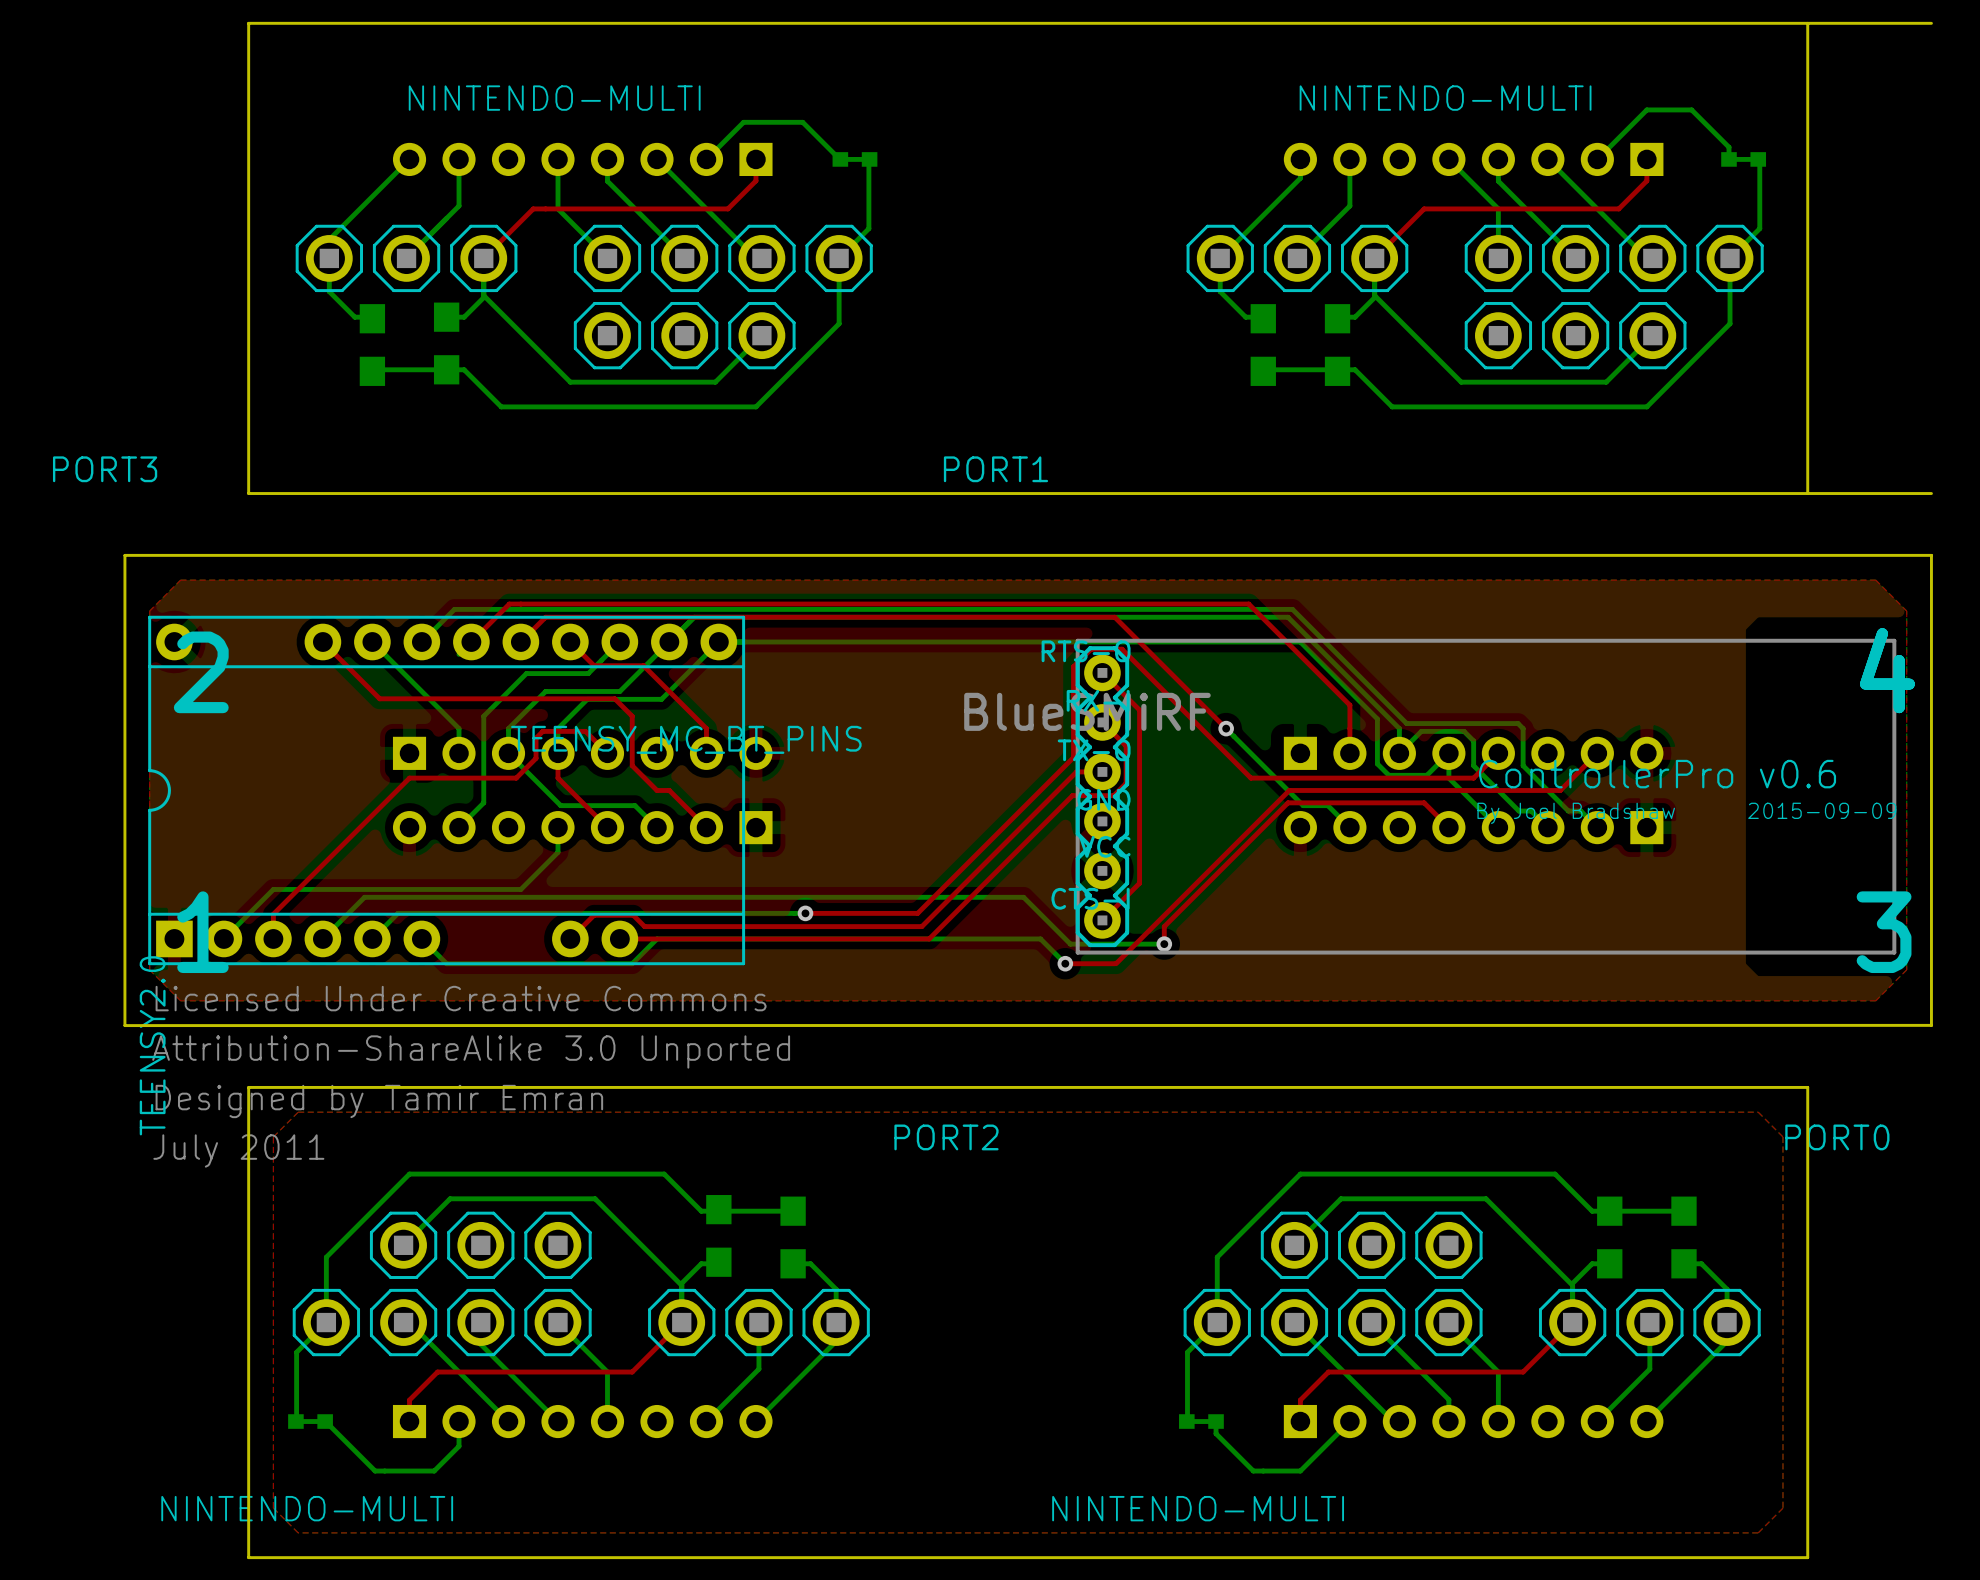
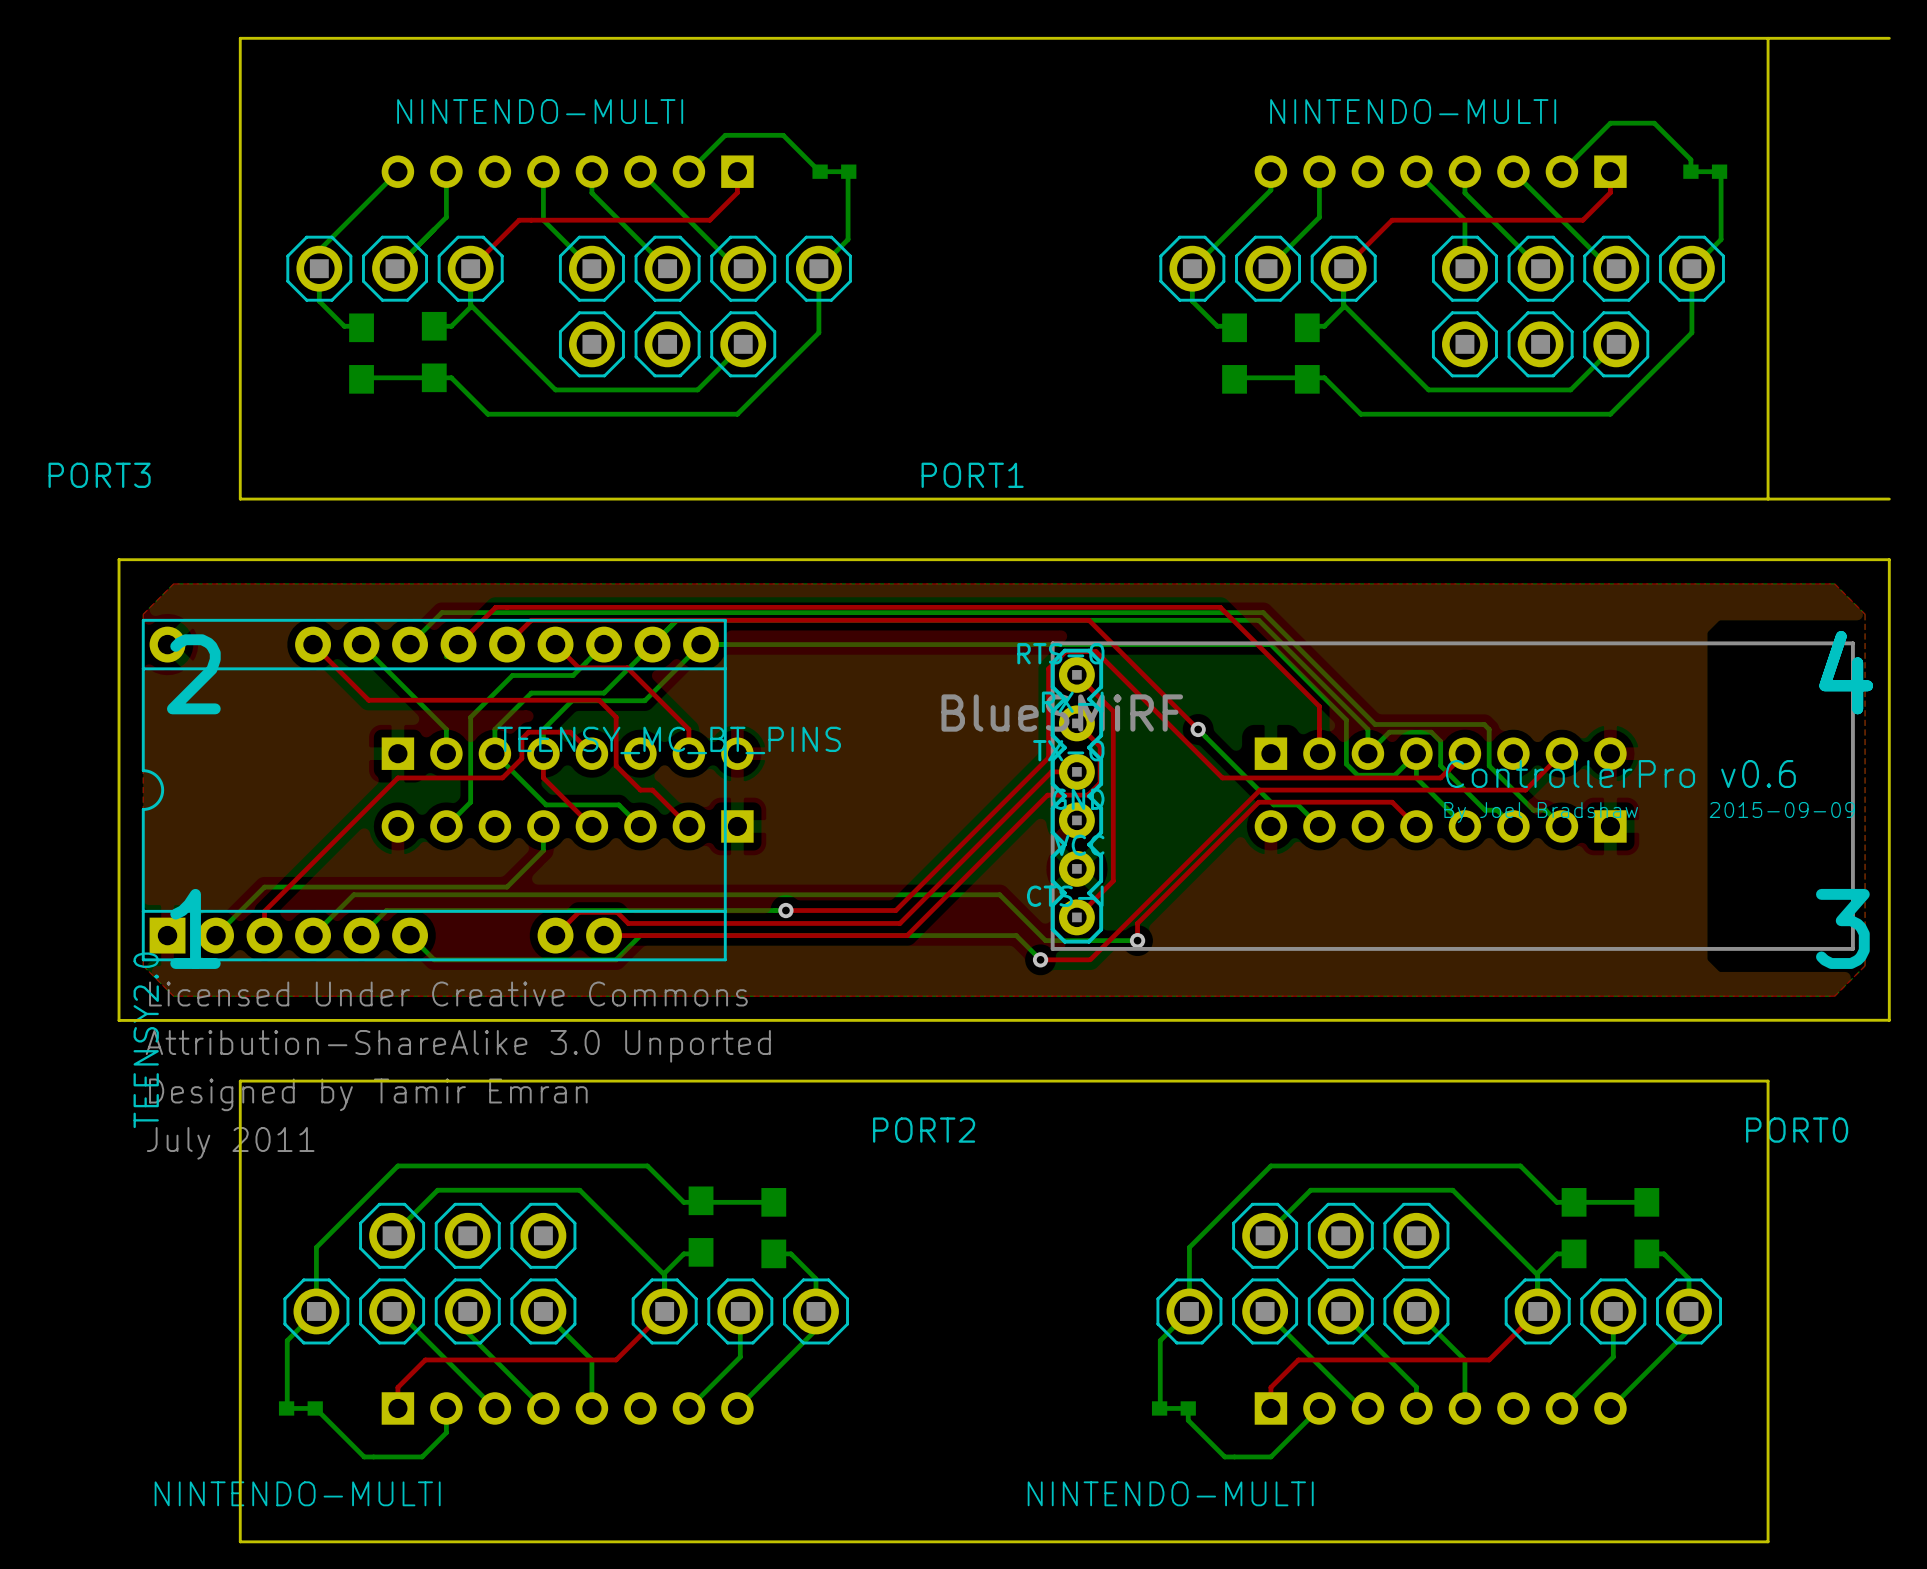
top zone outline: (298, 1112) (273, 1136) (273, 1508) (298, 1532) (1758, 1532) (1782, 1508) (1782, 1136) (1758, 1112) (298, 1112) -> none

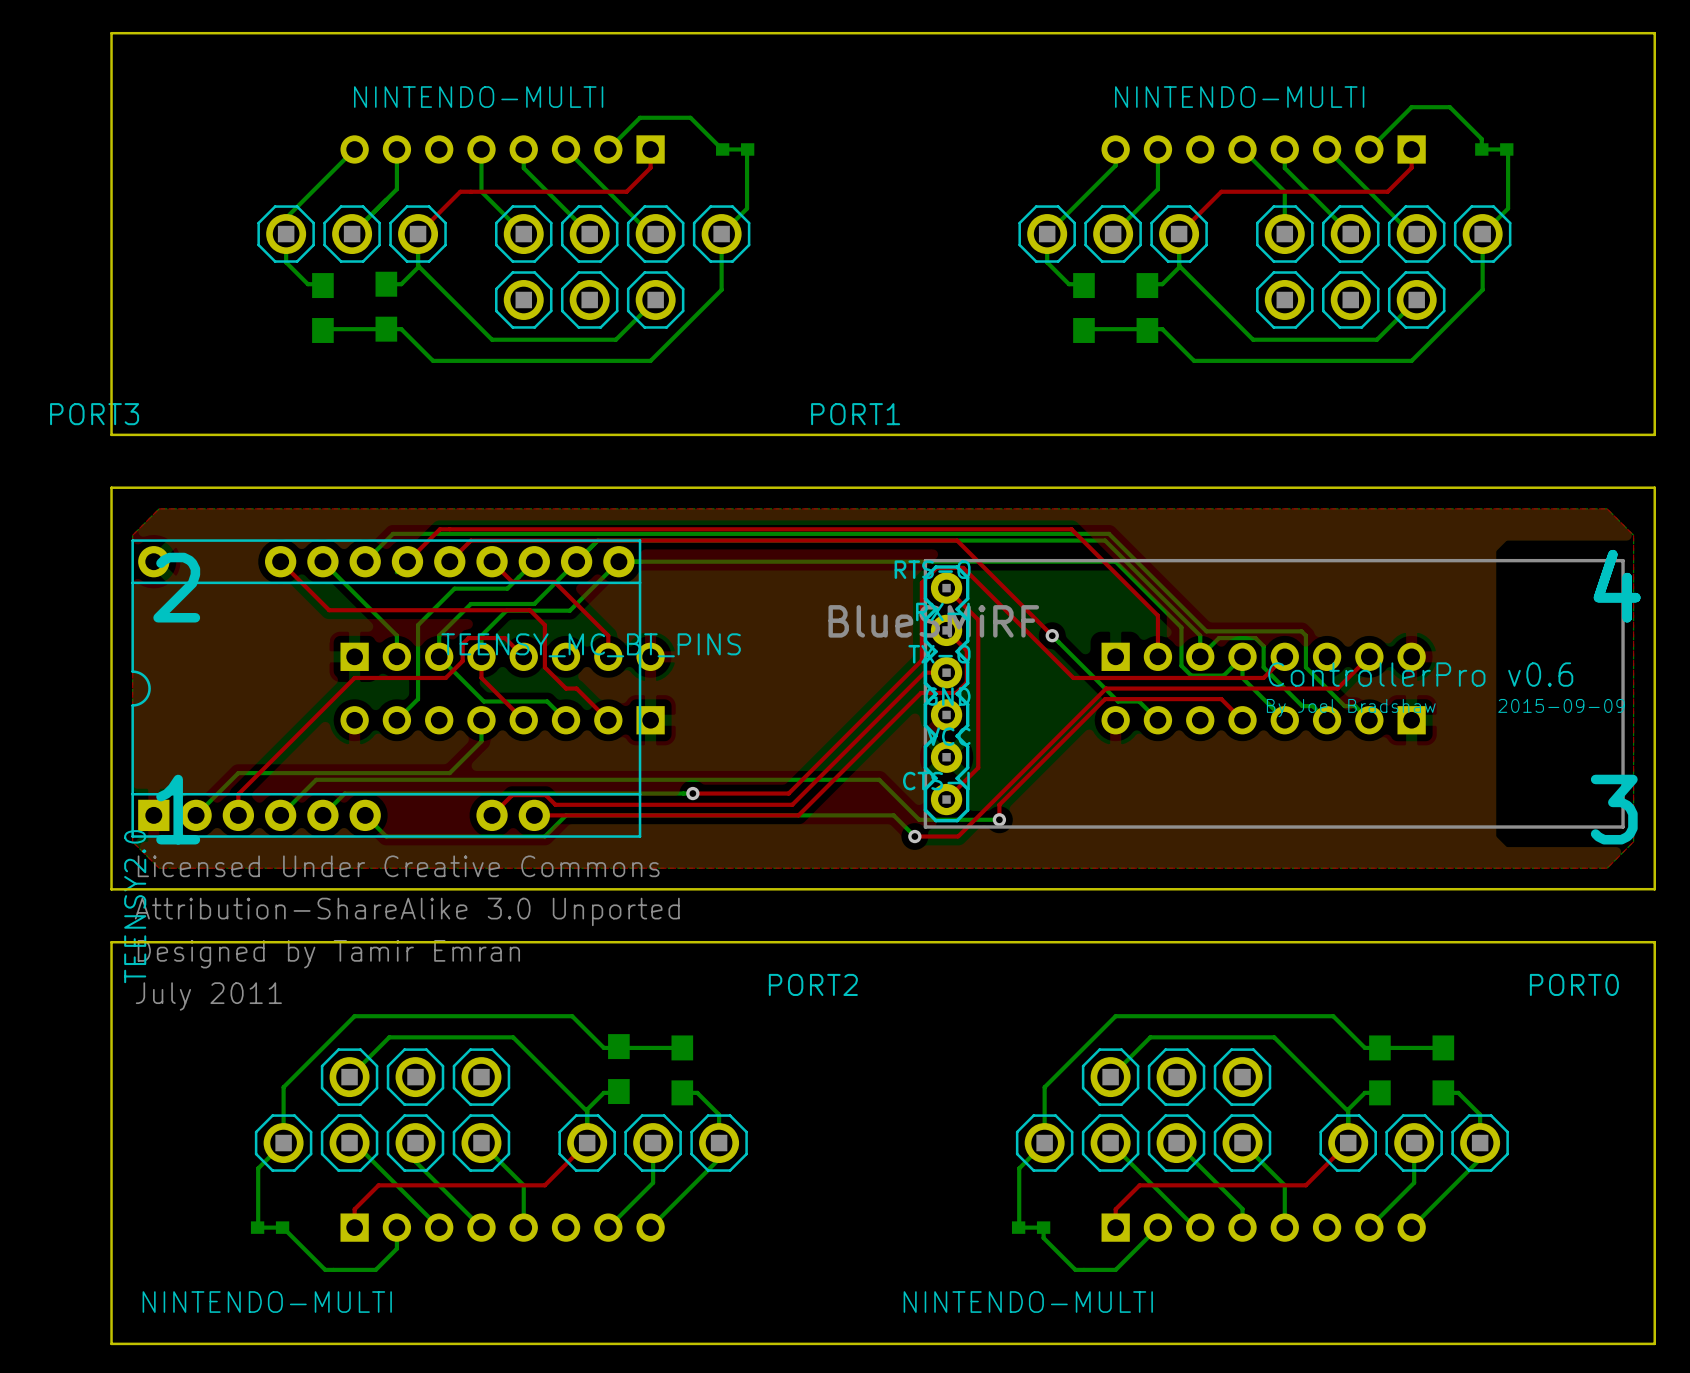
board edge: (240, 38) (240, 499) -> (217, 33) (111, 33) (111, 434) (217, 434)
board edge: (1768, 38) (1768, 499) -> (1654, 33) (1654, 434)
board edge: (240, 1081) (240, 1541) -> (217, 942) (111, 942) (111, 1343) (217, 1343)
board edge: (1768, 1081) (1768, 1541) -> (1549, 942) (1654, 942) (1654, 1343) (1549, 1343)

